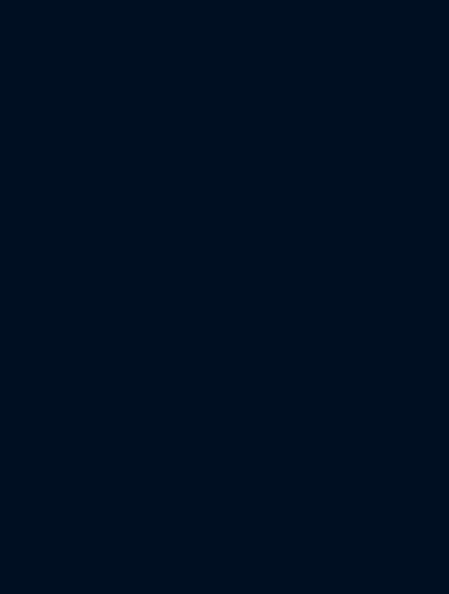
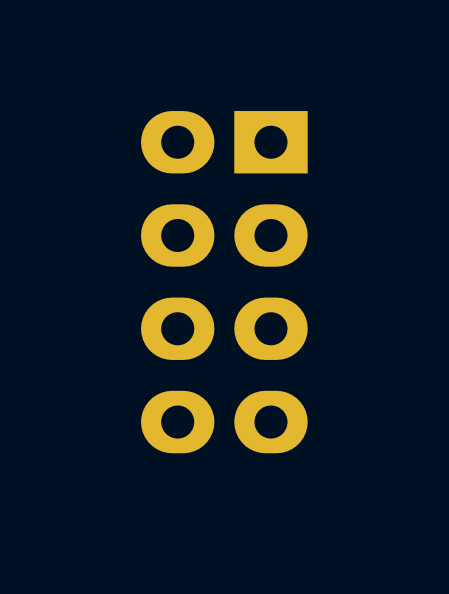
part: none -> (224, 282)

